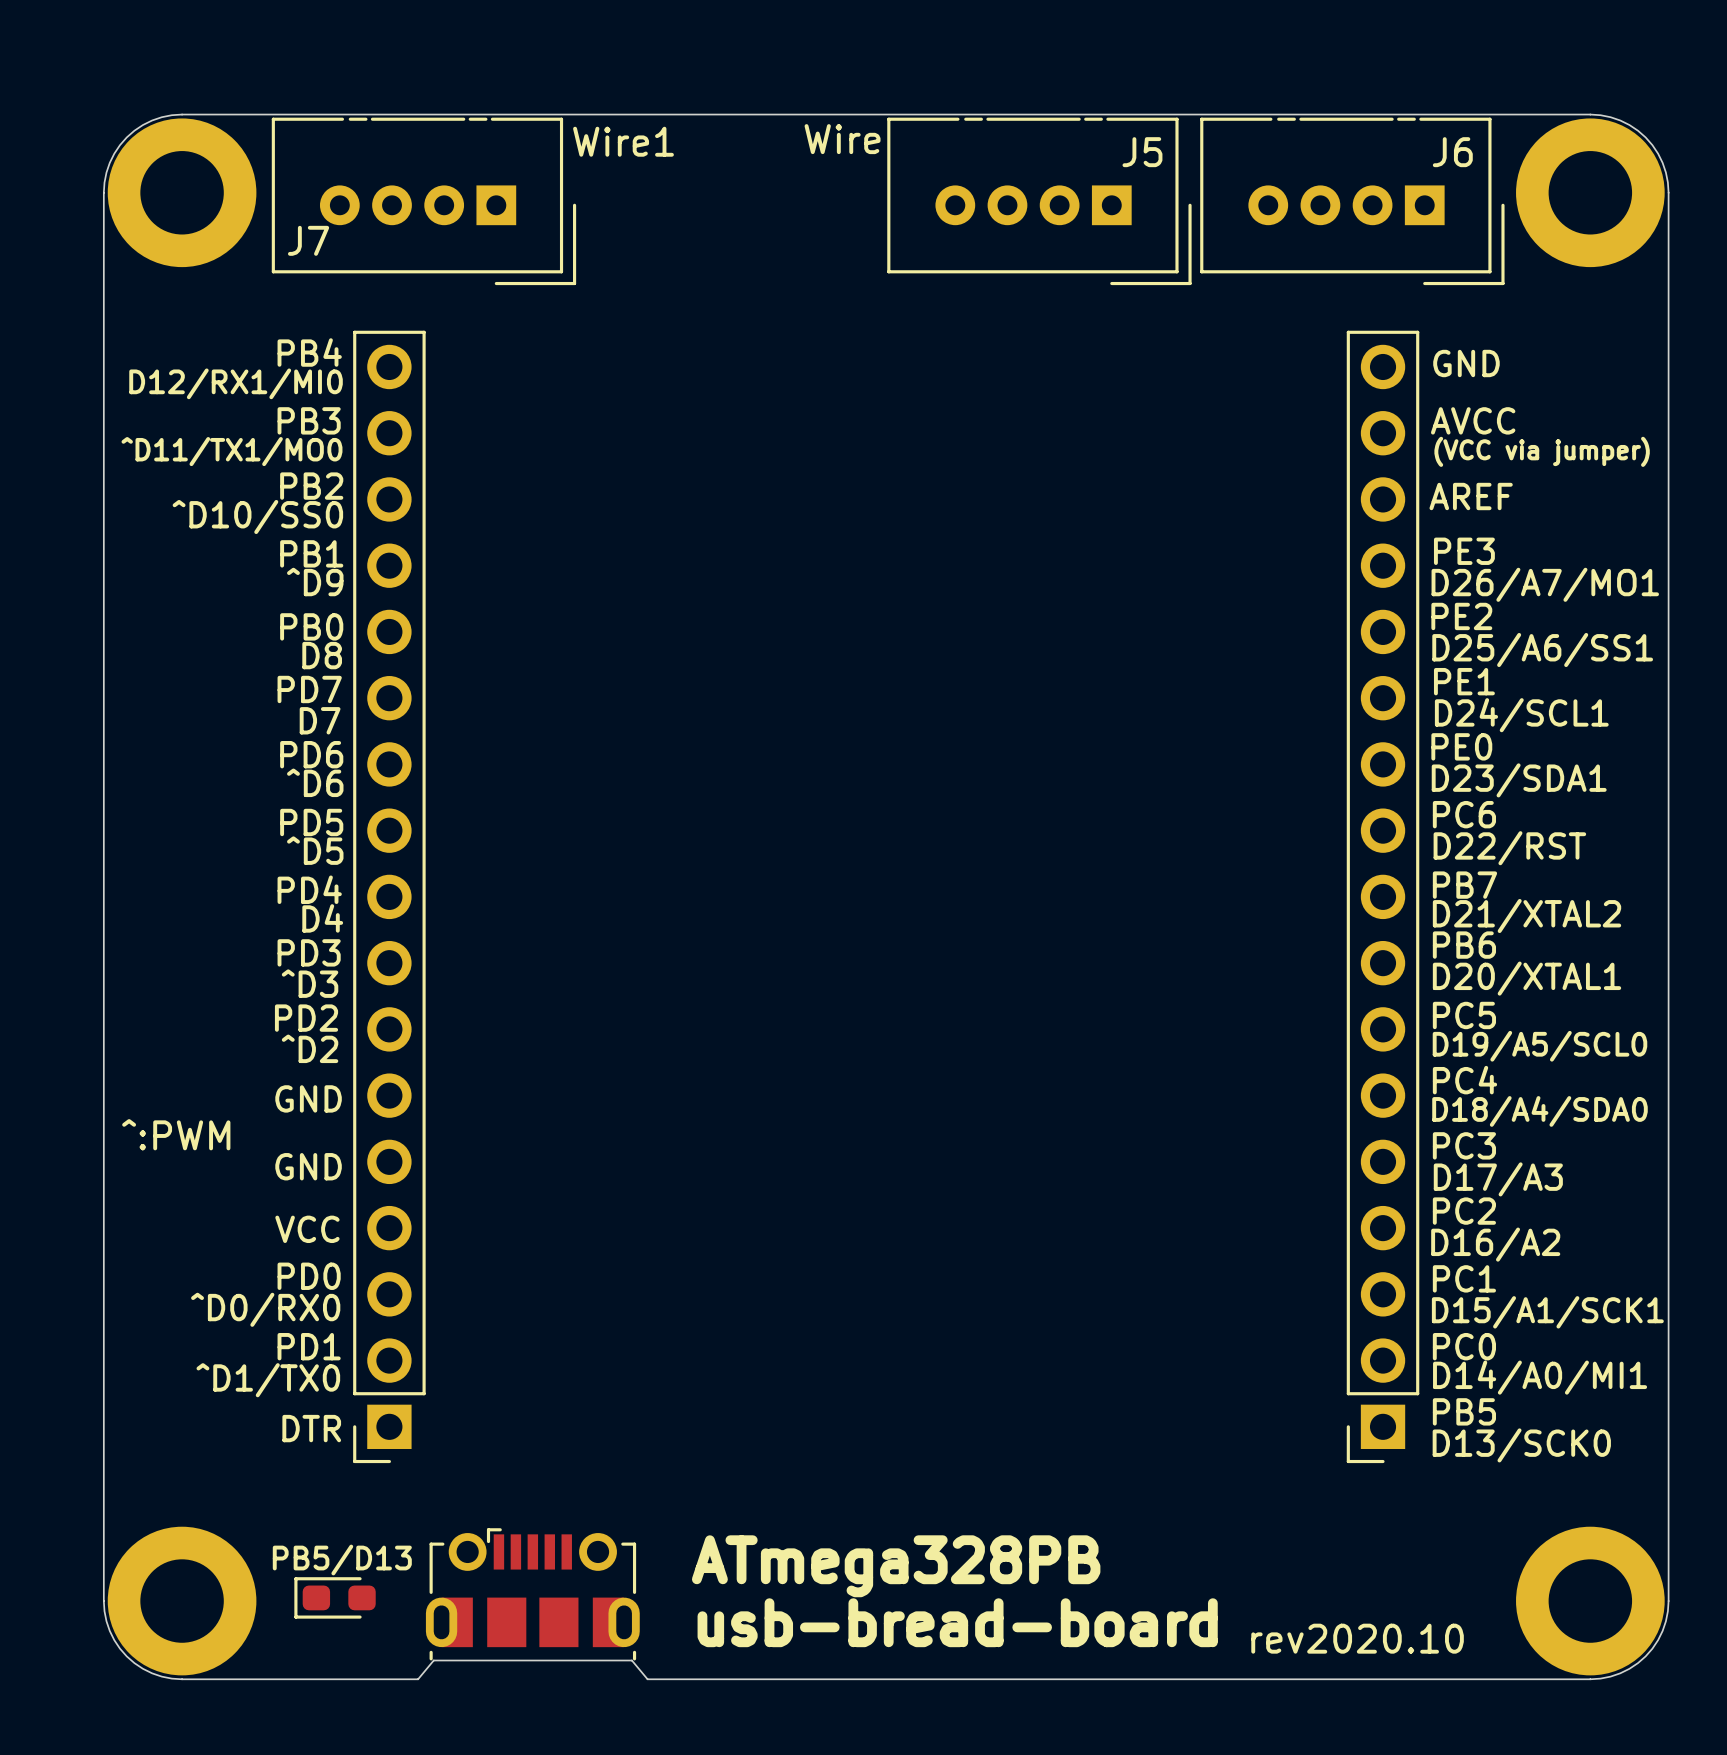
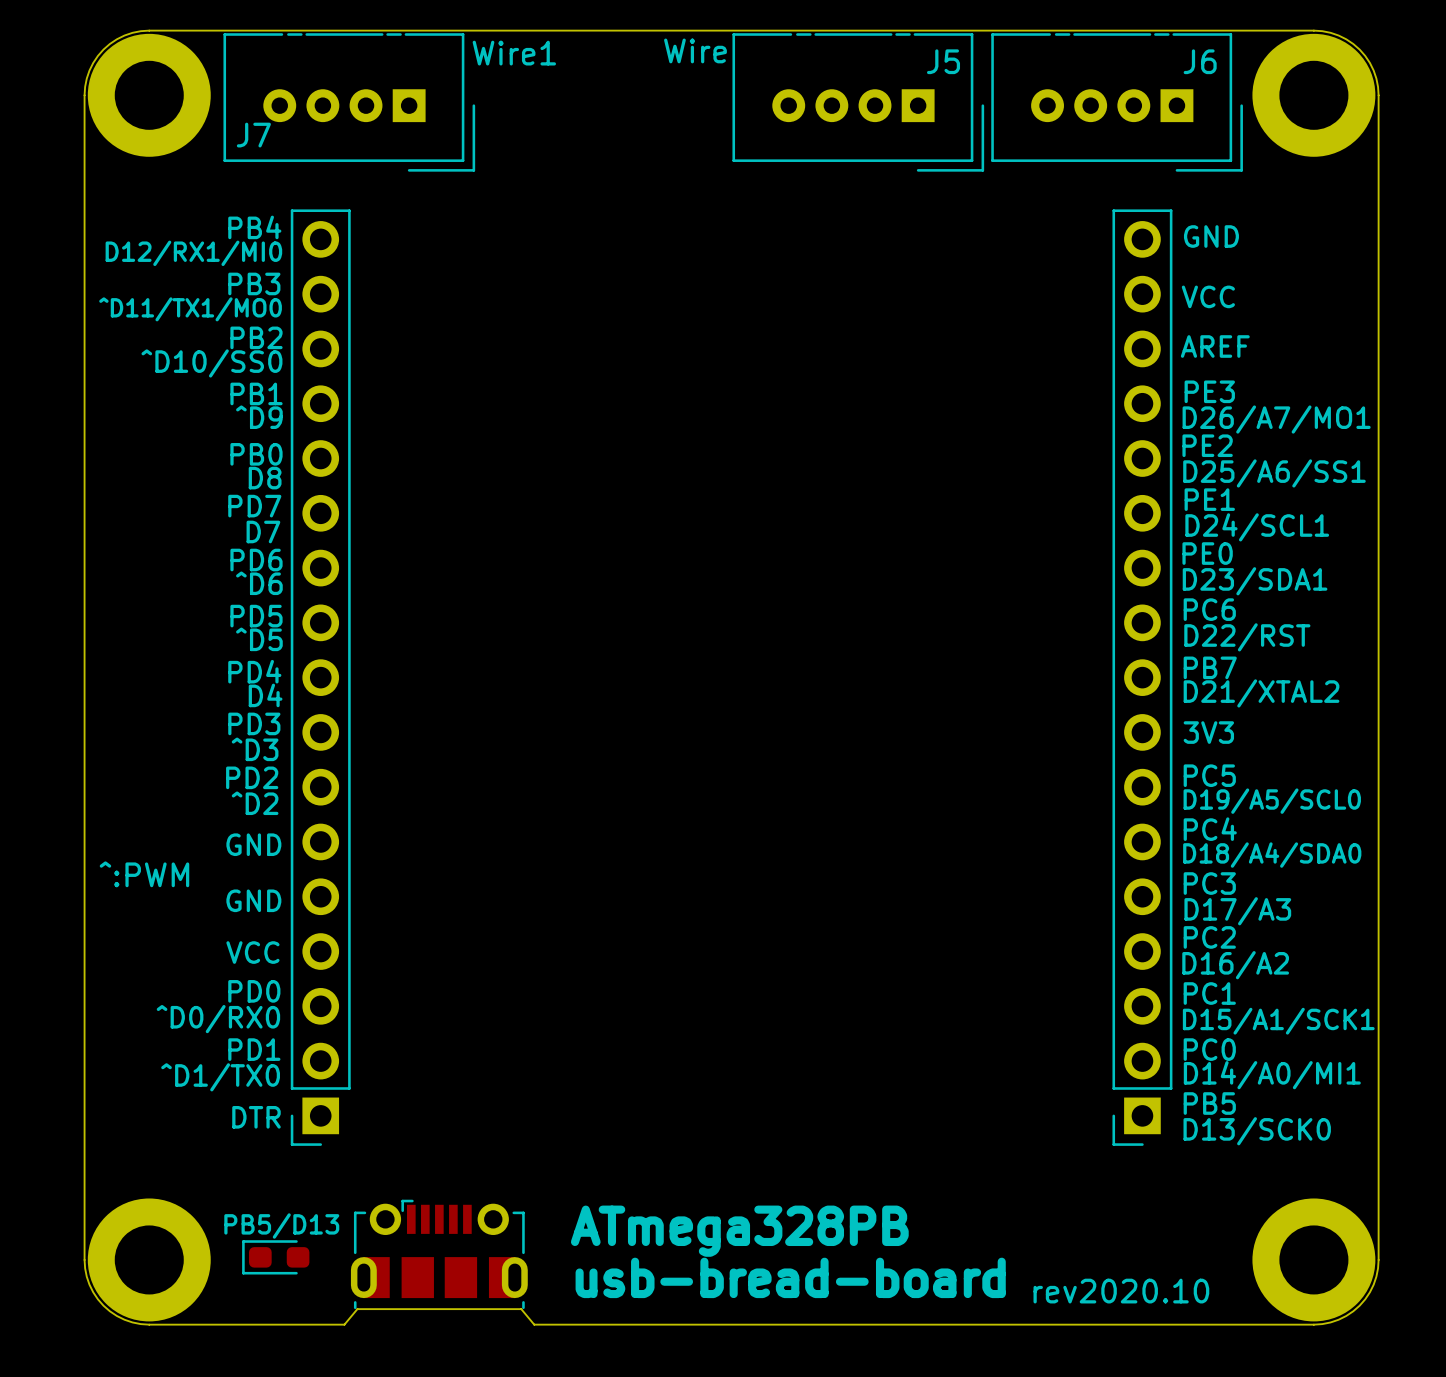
text: AVCC (1473, 420) -> VCC (1208, 296)
text: (VCC via jumper) (1542, 451) -> none
text: PB6 (1464, 945) -> 3V3 (1208, 732)
text: D20/XTAL1 (1527, 978) -> none

